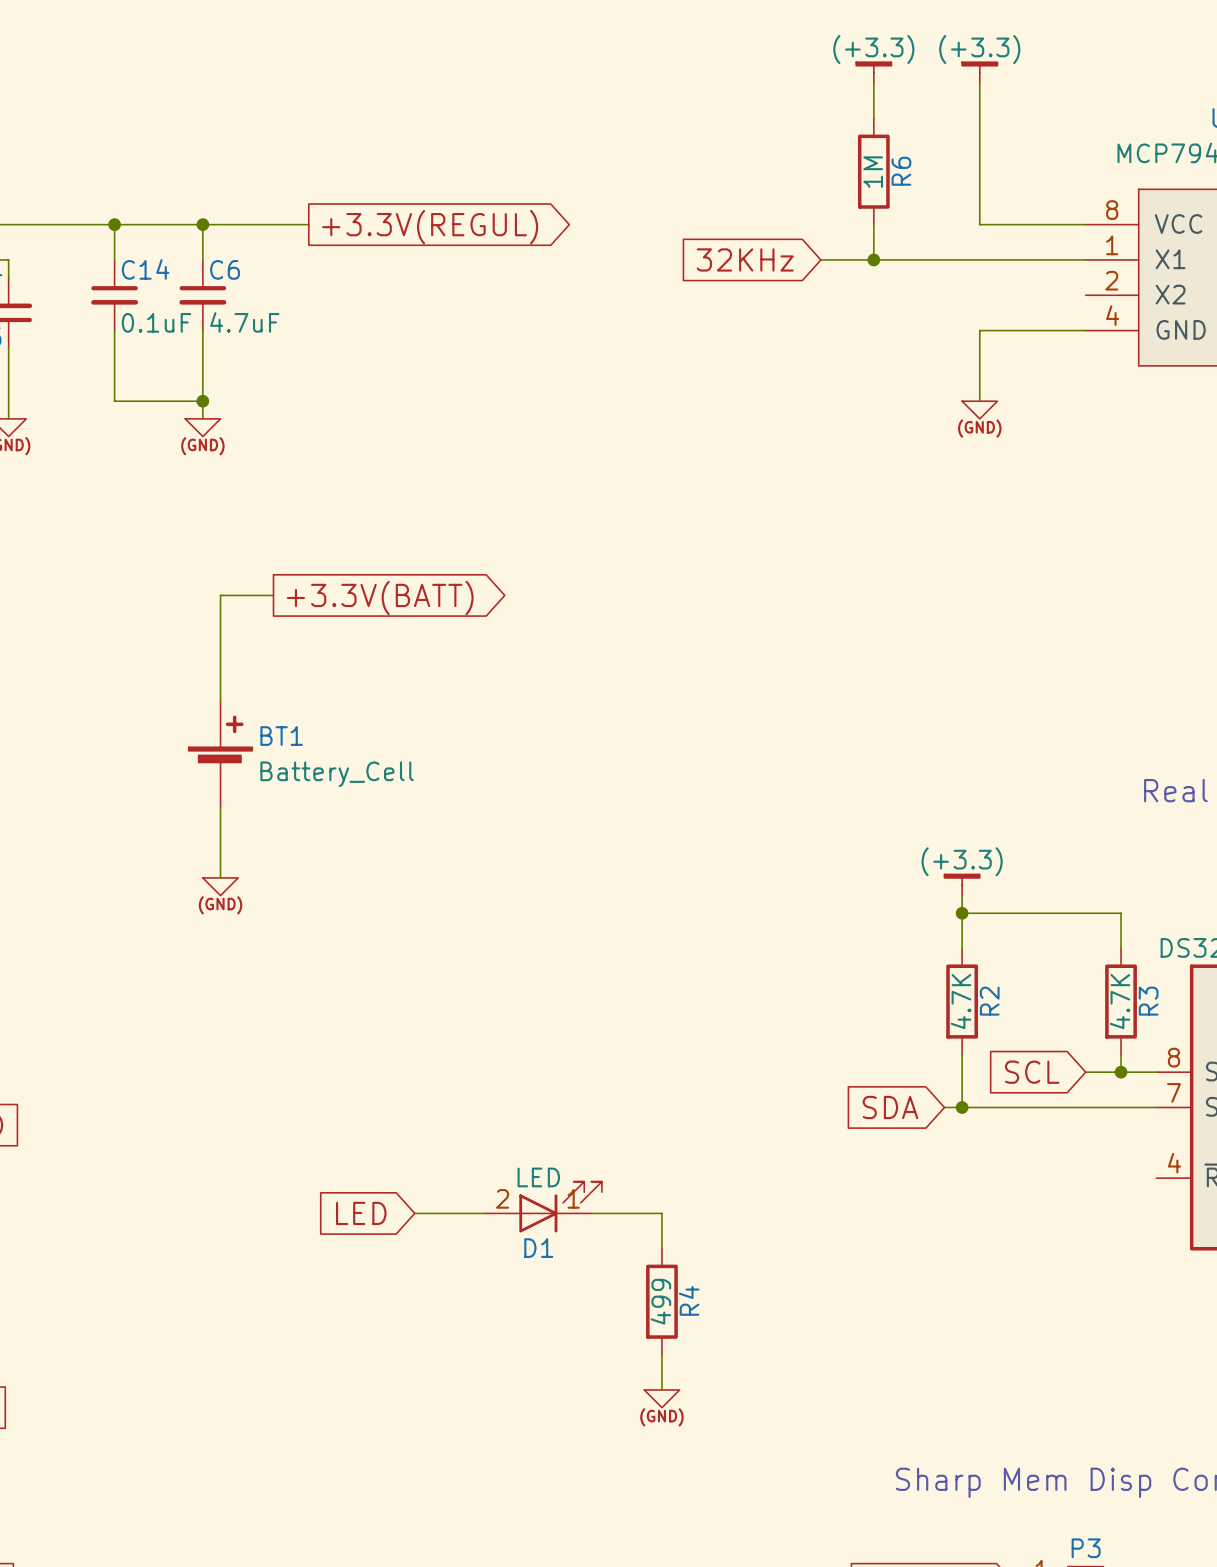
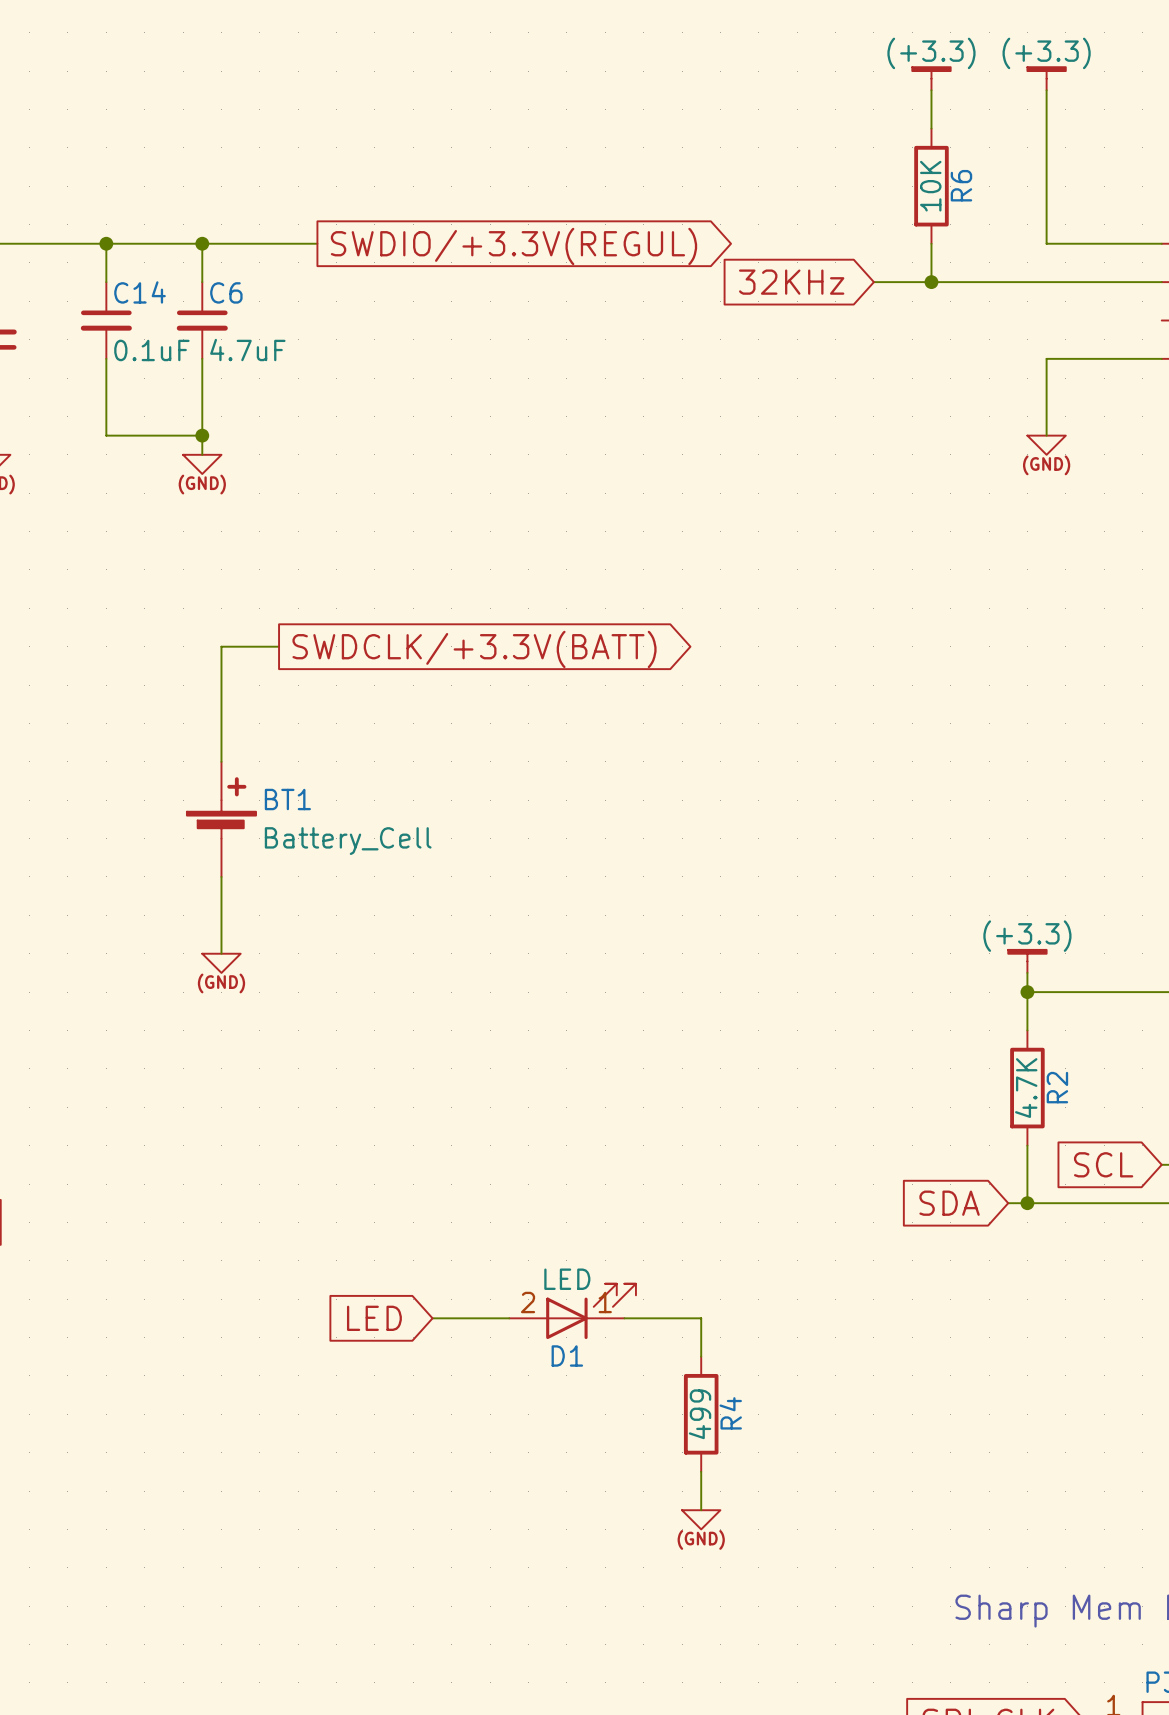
R6 value: 1M (873, 172) -> 10K (930, 186)
global label: +3.3V(REGUL) (430, 227) -> SWDIO/+3.3V(REGUL) (513, 246)
global label: +3.3V(BATT) (380, 597) -> SWDCLK/+3.3V(BATT) (474, 649)

